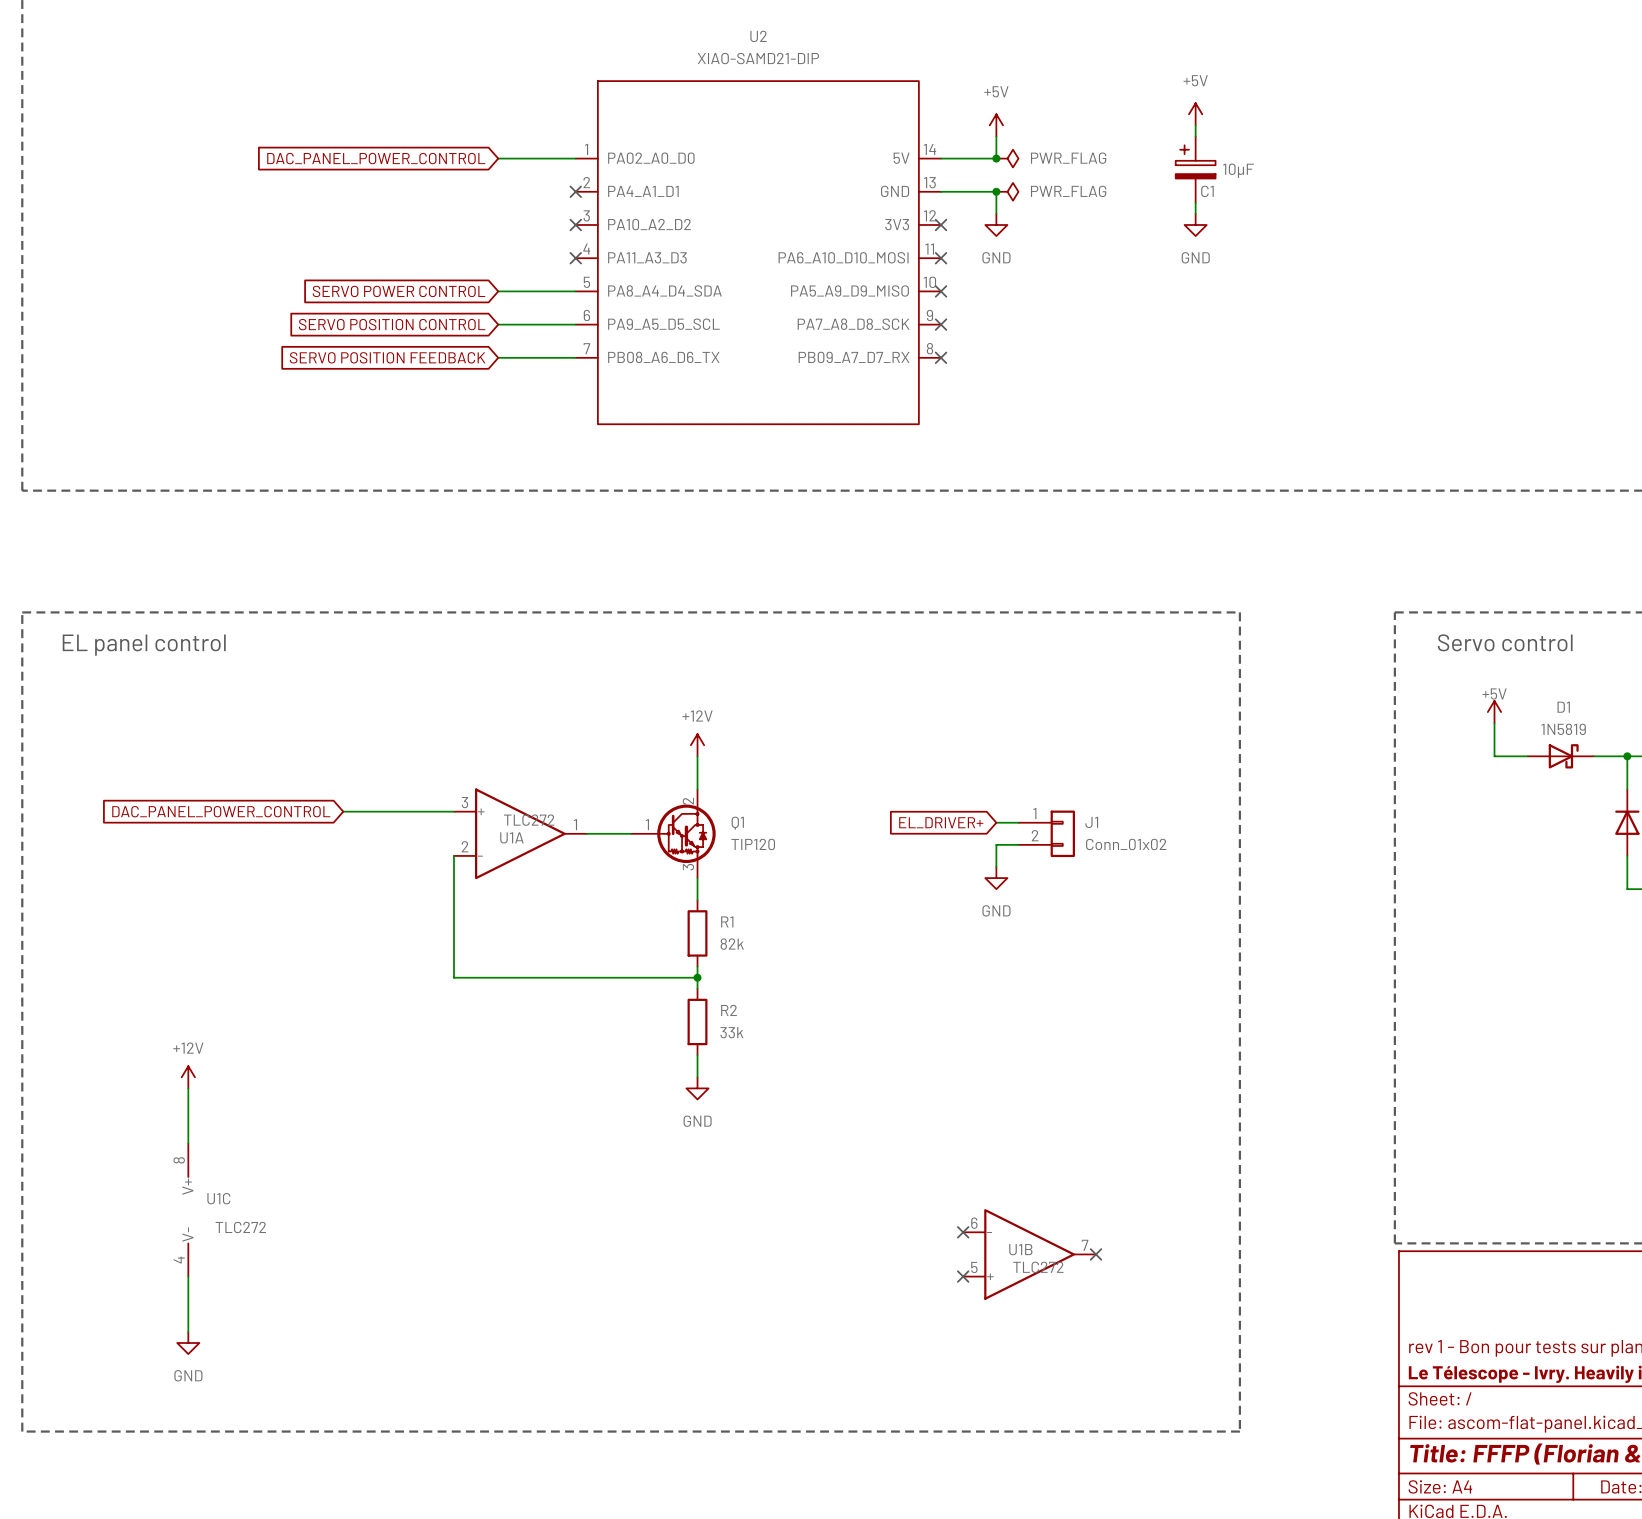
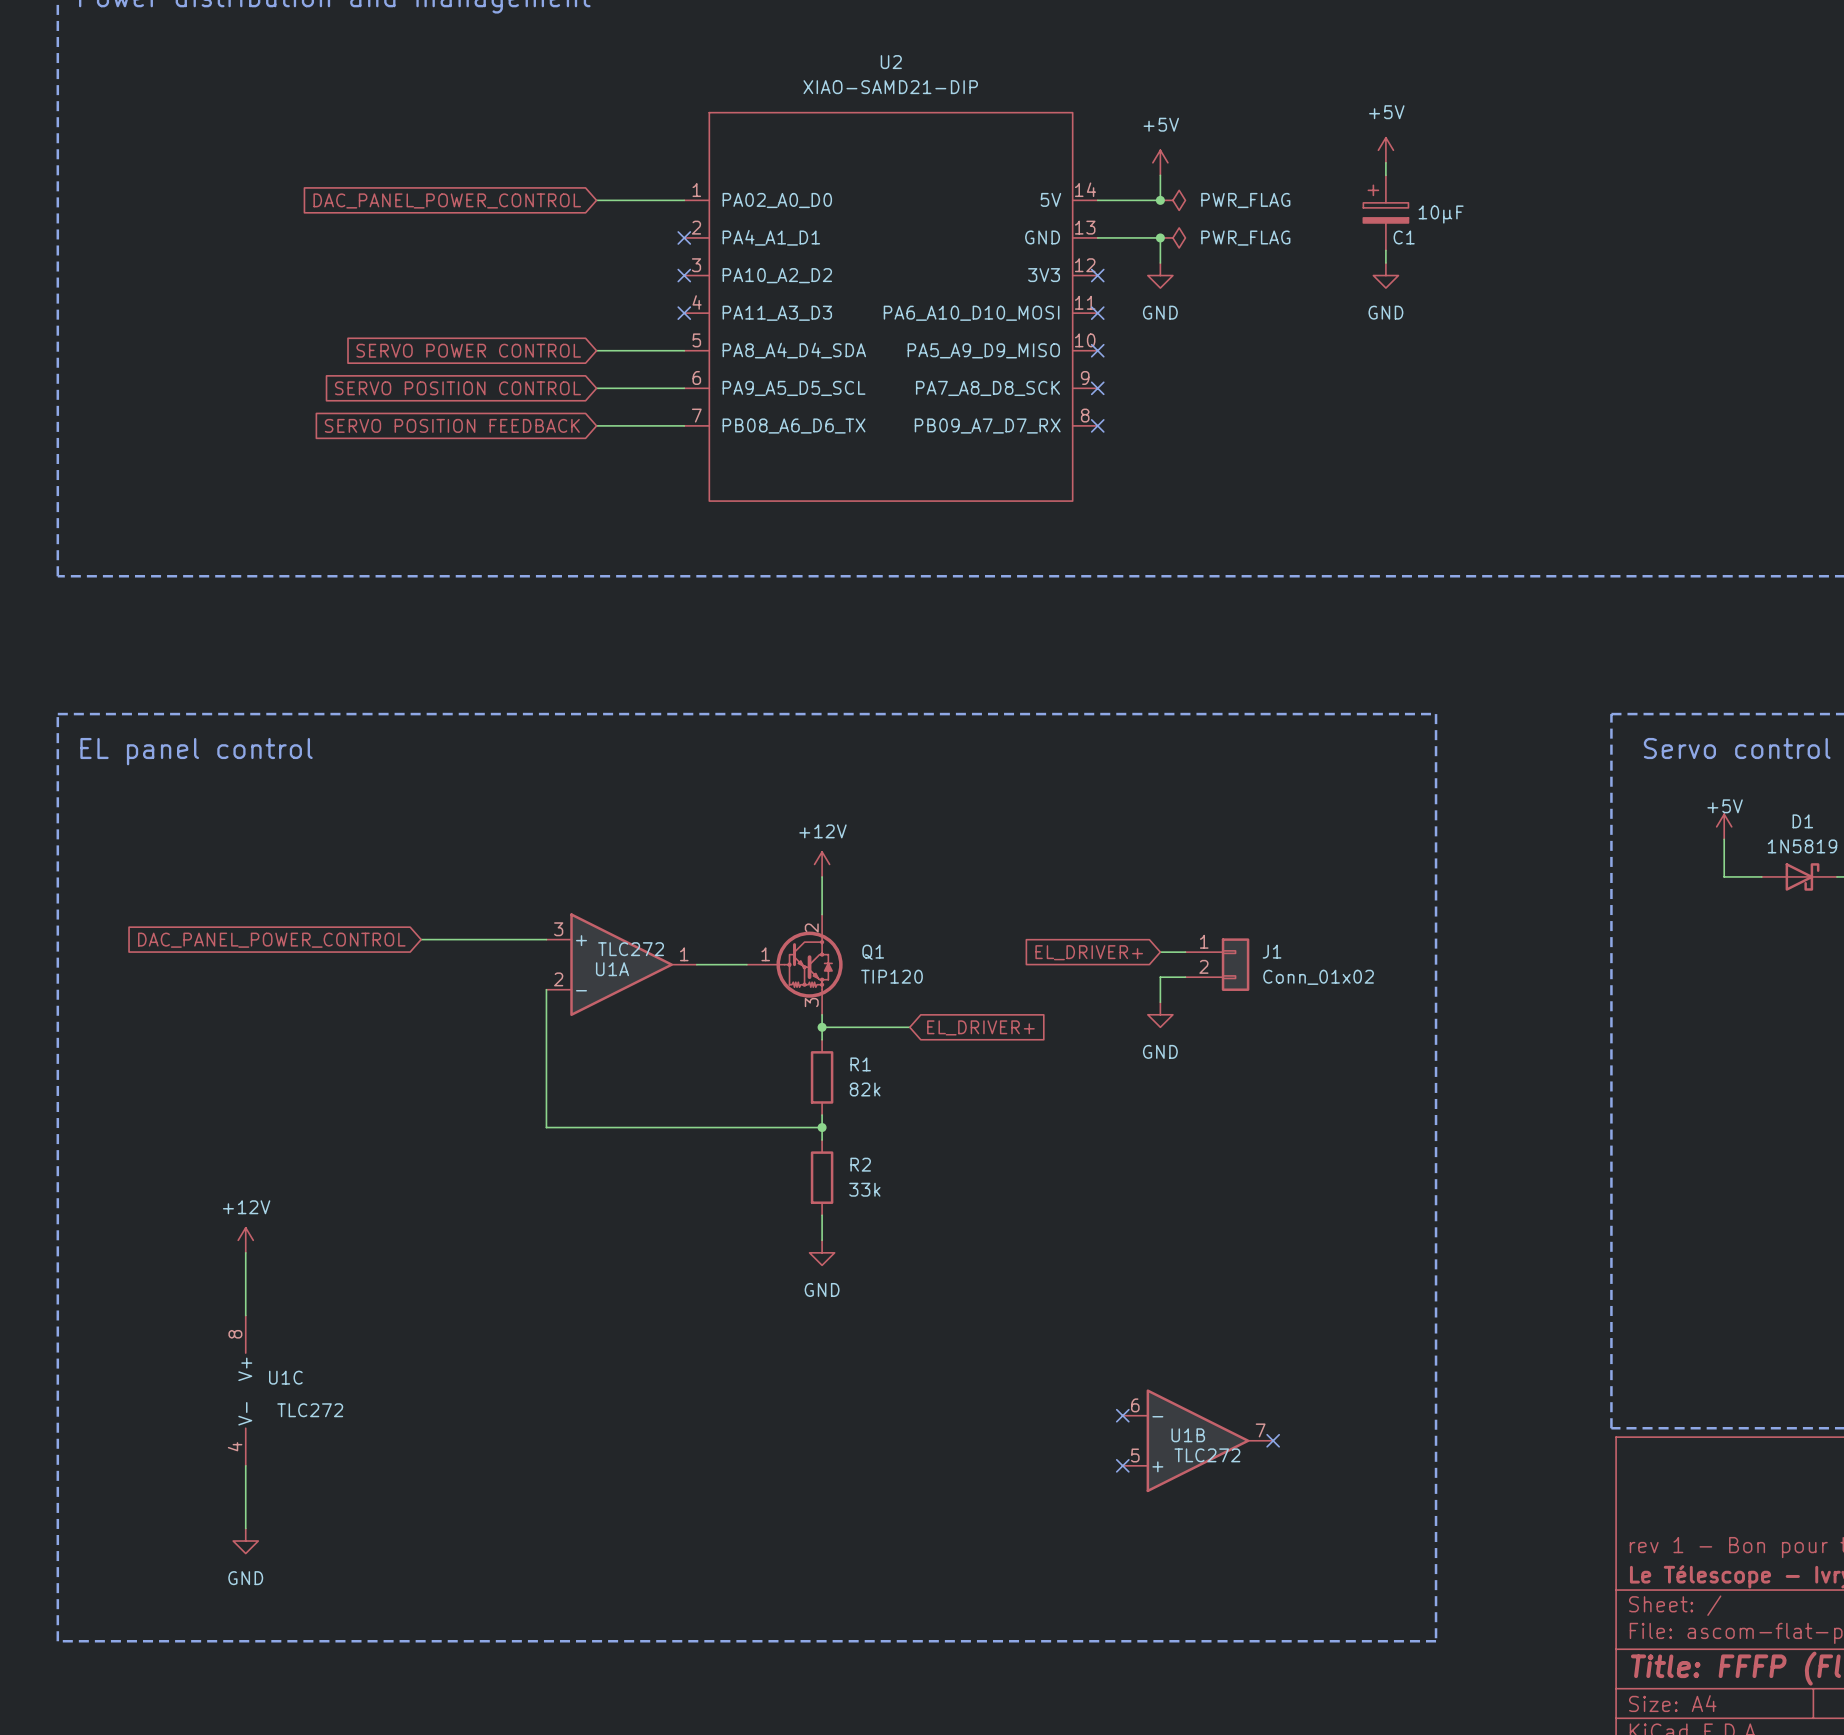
wire: none -> (822, 1027) (909, 1027)
junction: none -> (822, 1027)
global label: none -> EL_DRIVER+ (980, 1027)

